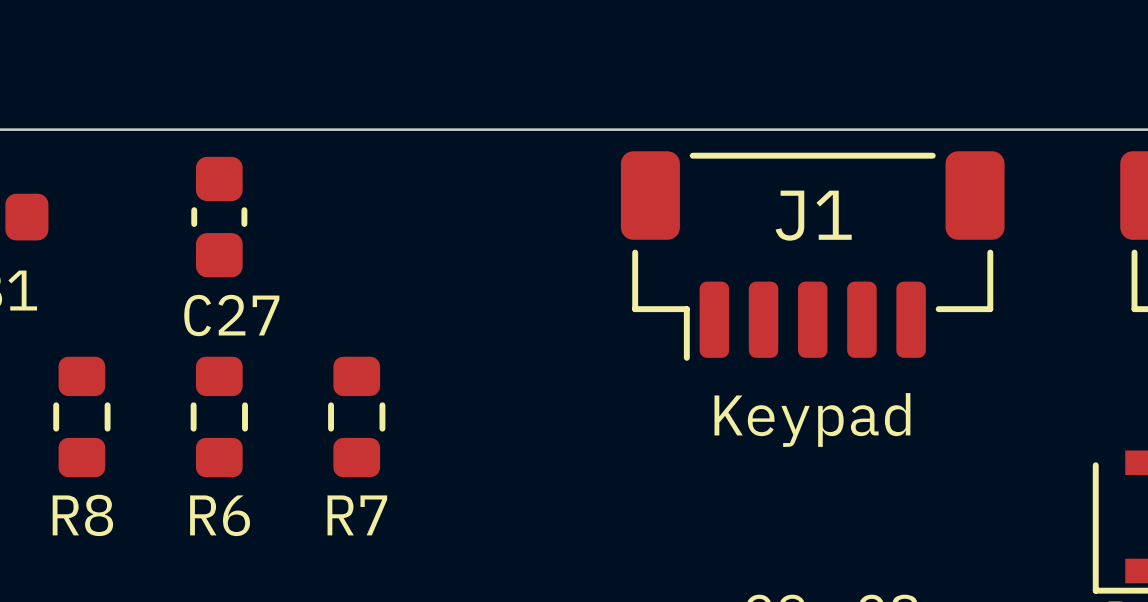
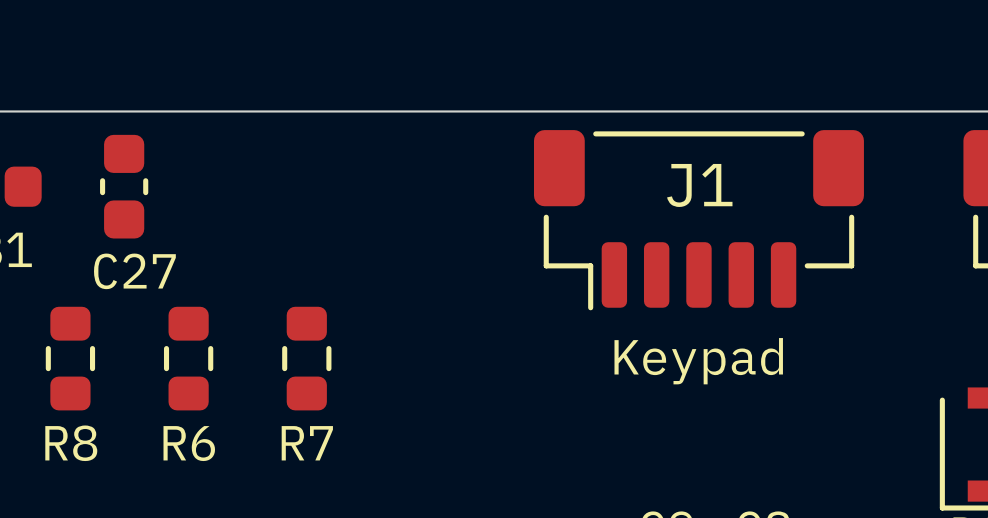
C27 position: (219, 217) -> (124, 186)

